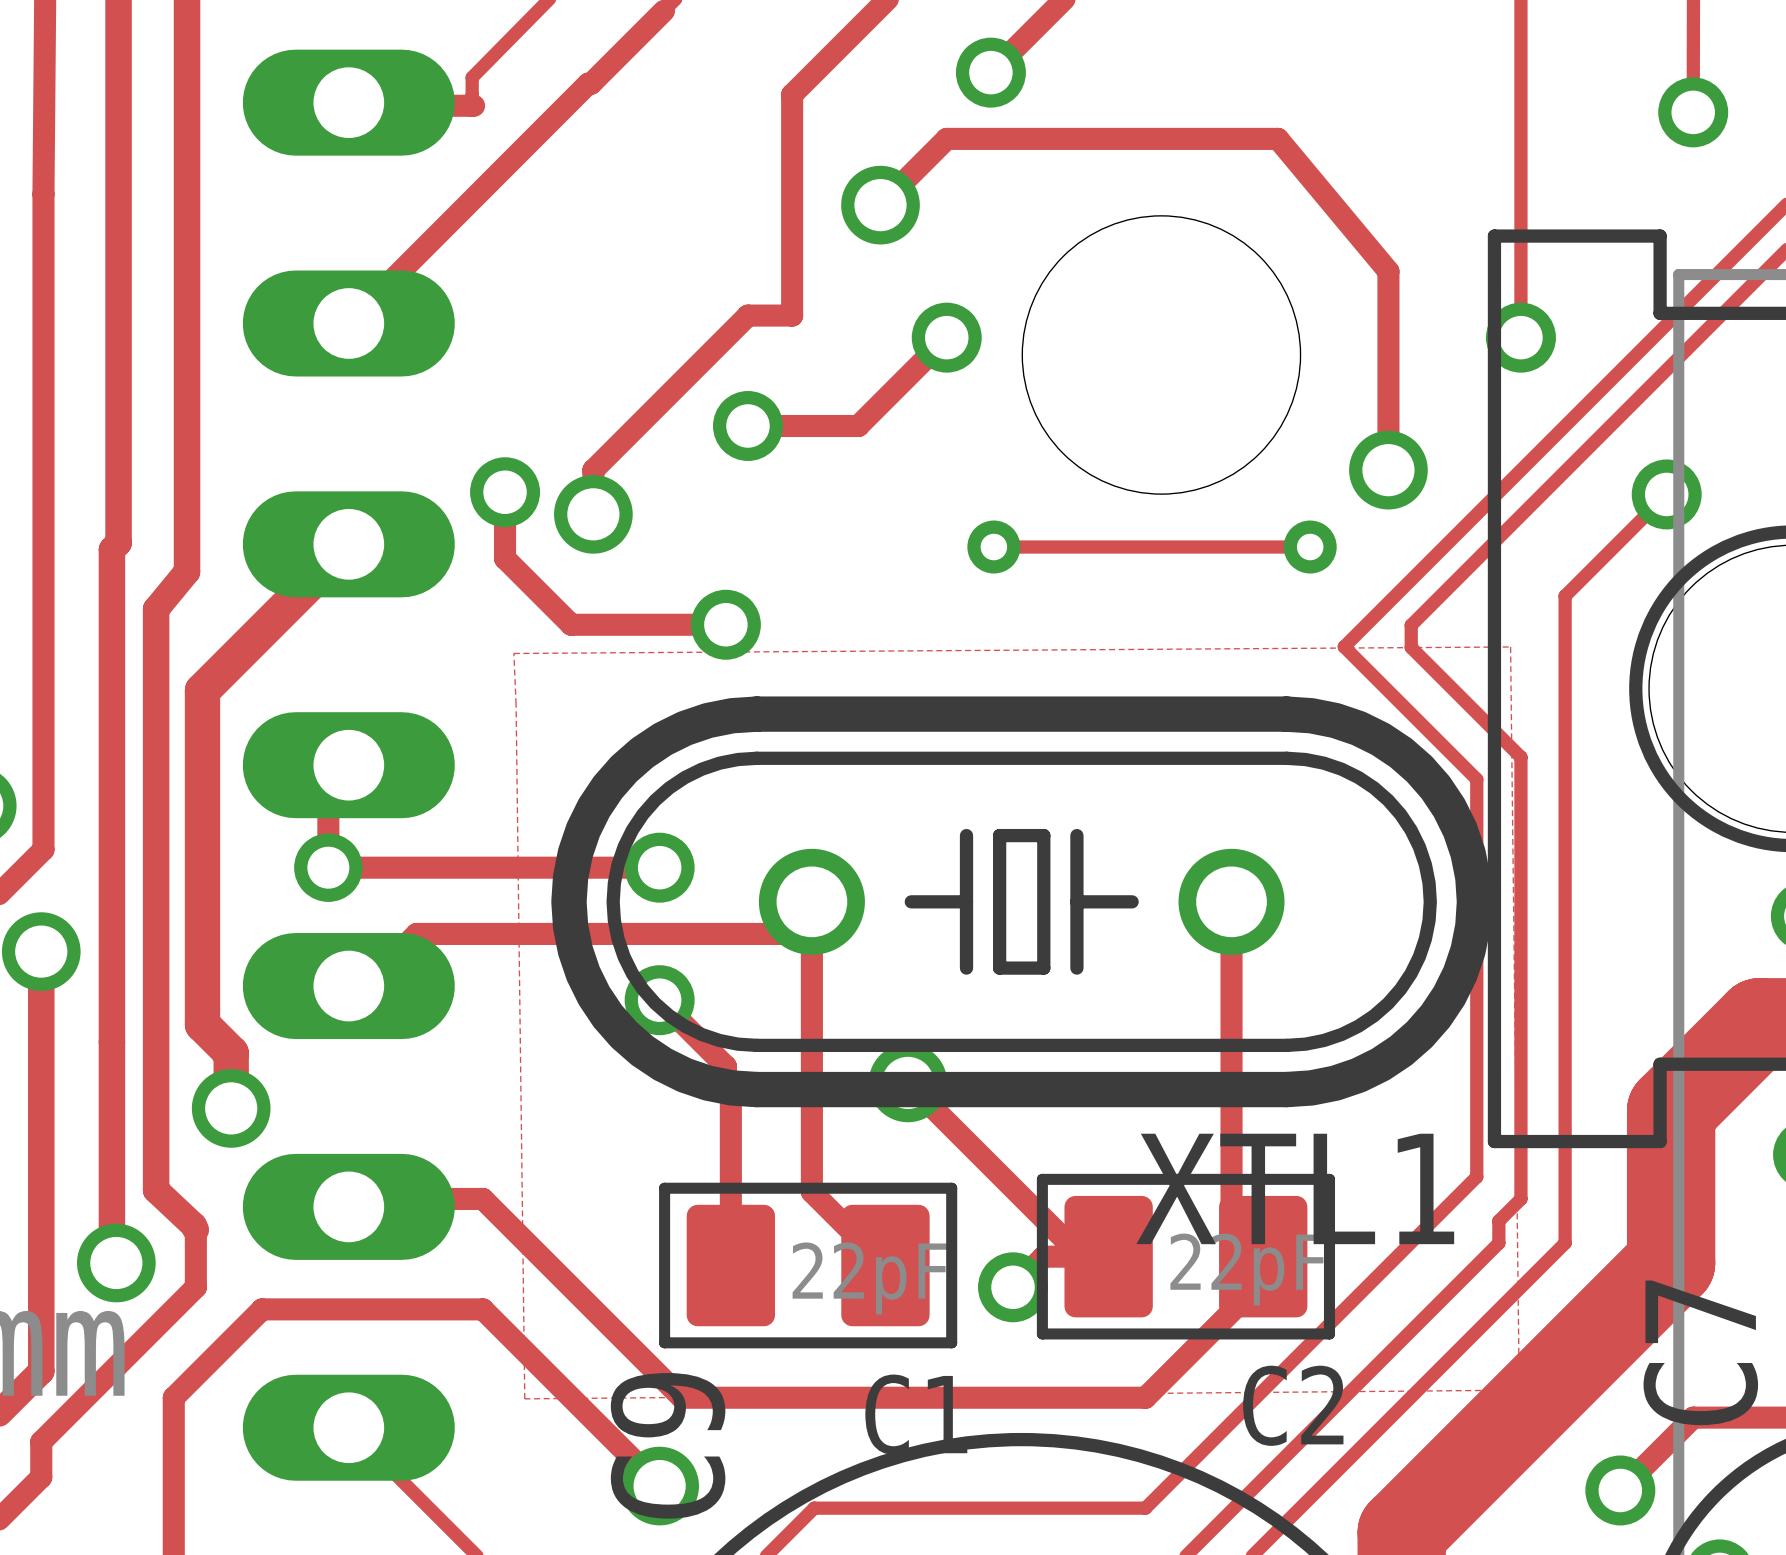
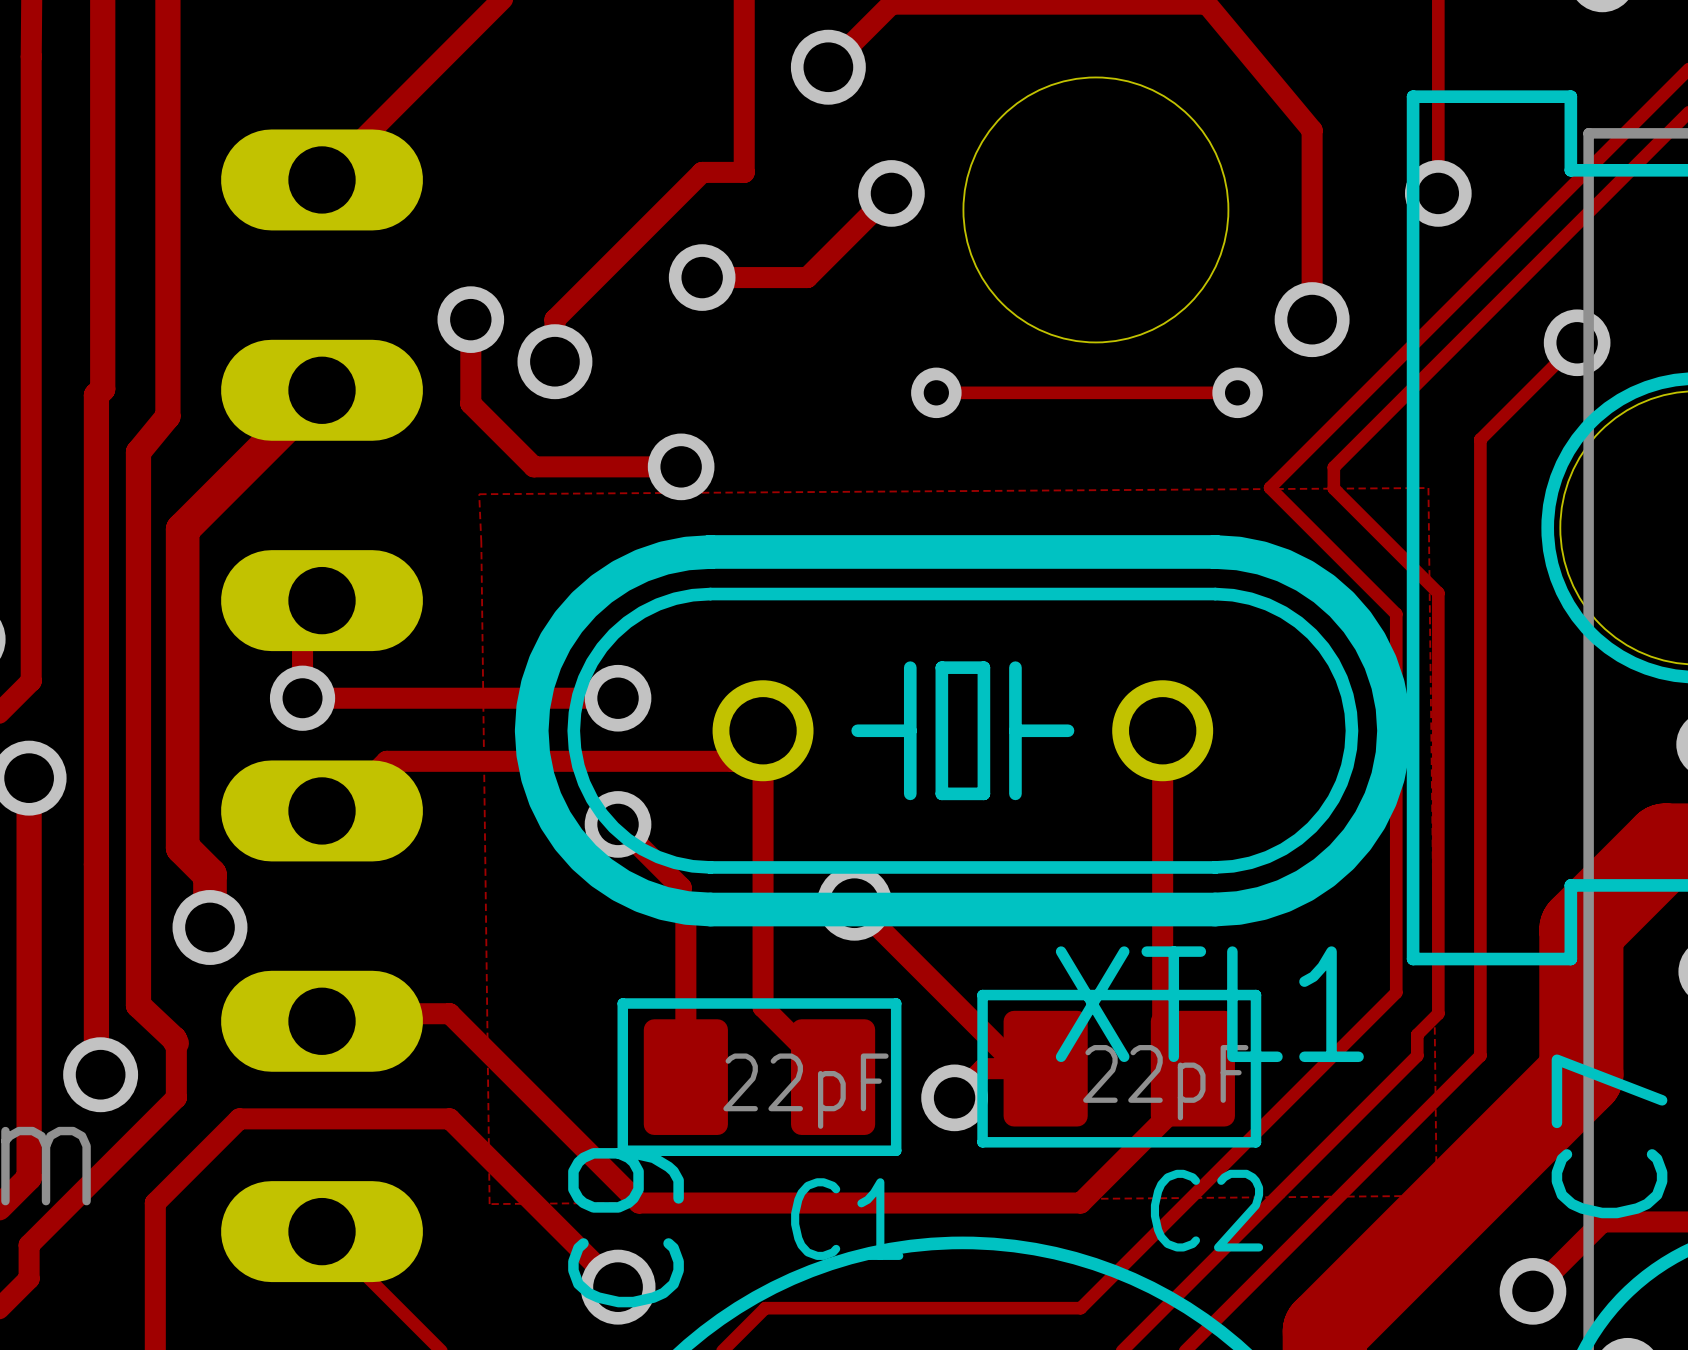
via position: (505, 492) -> (470, 319)

